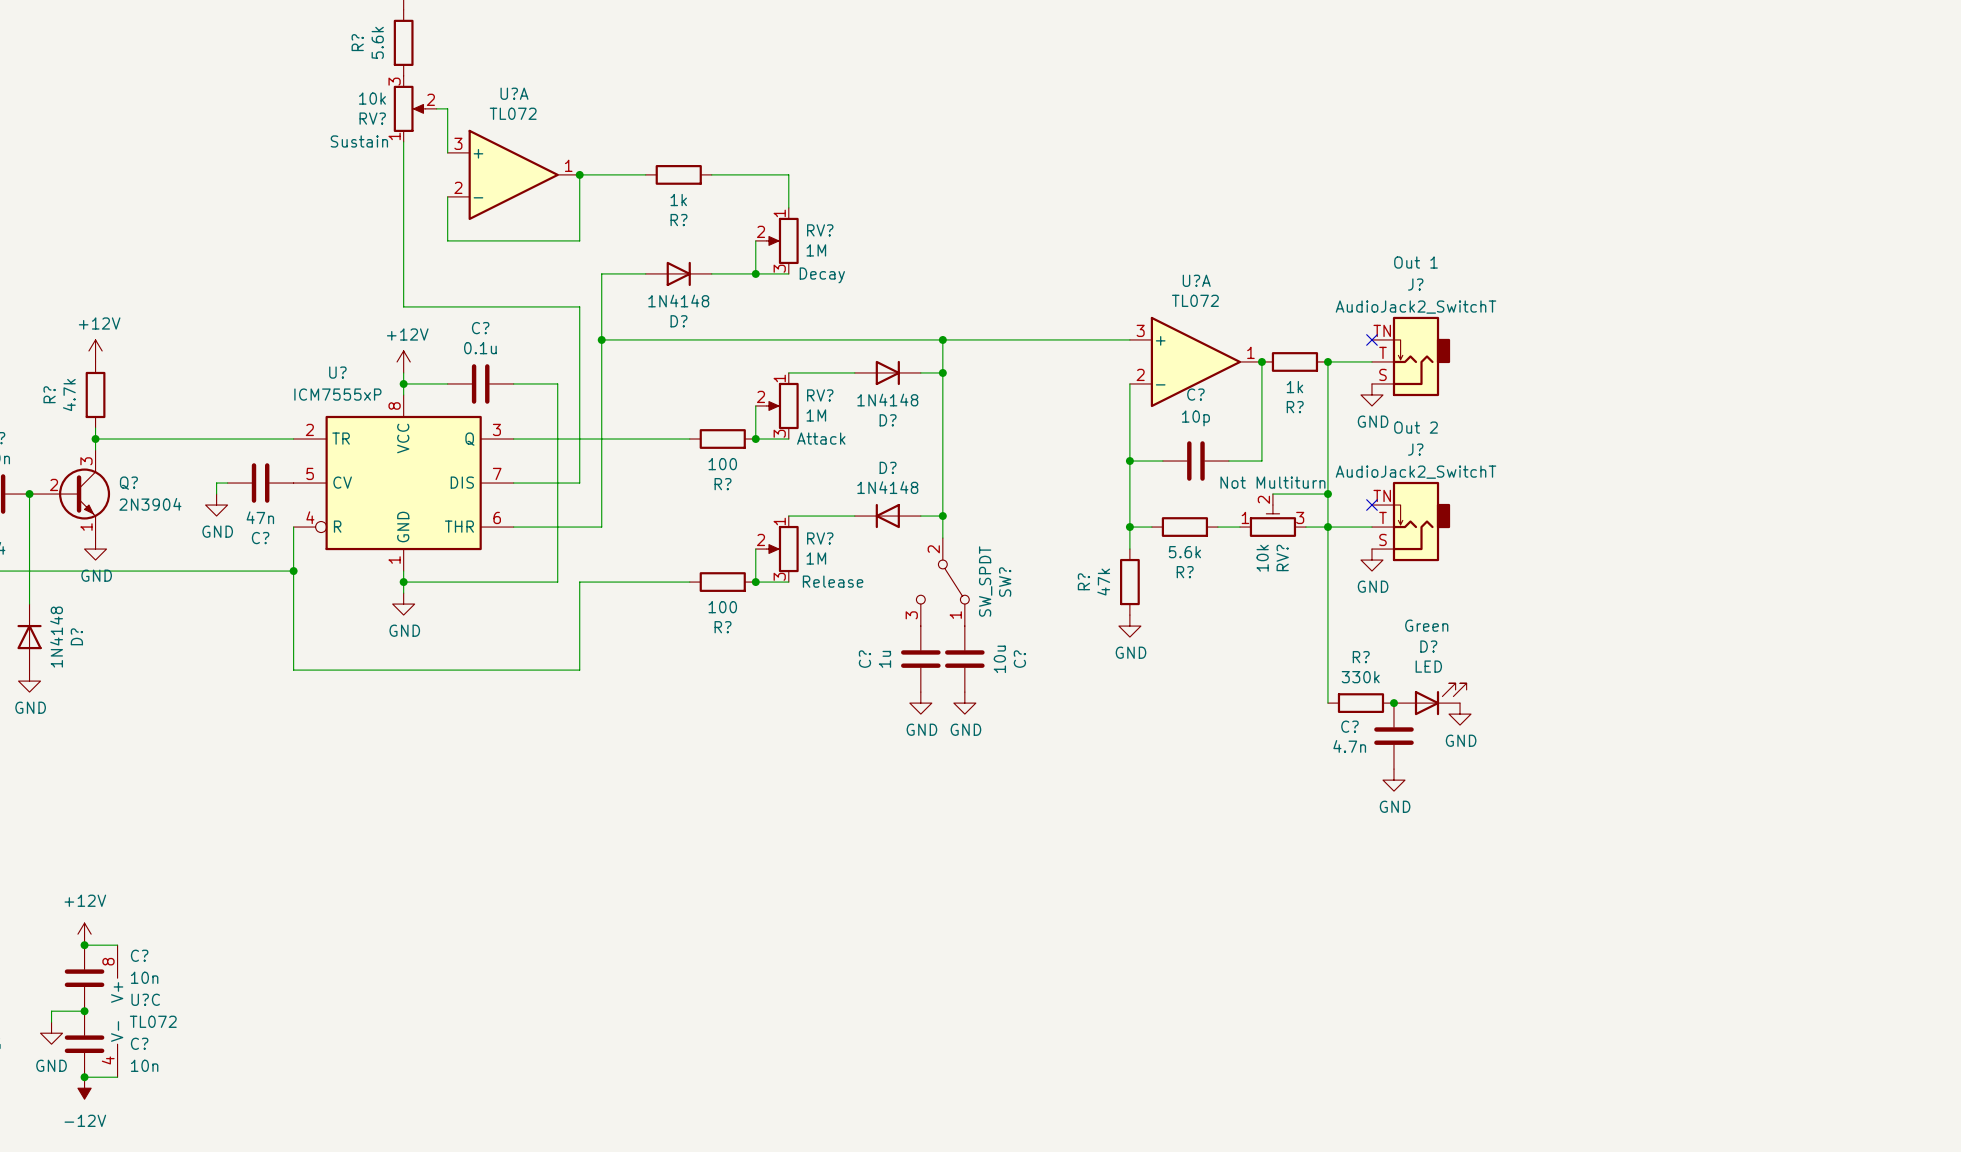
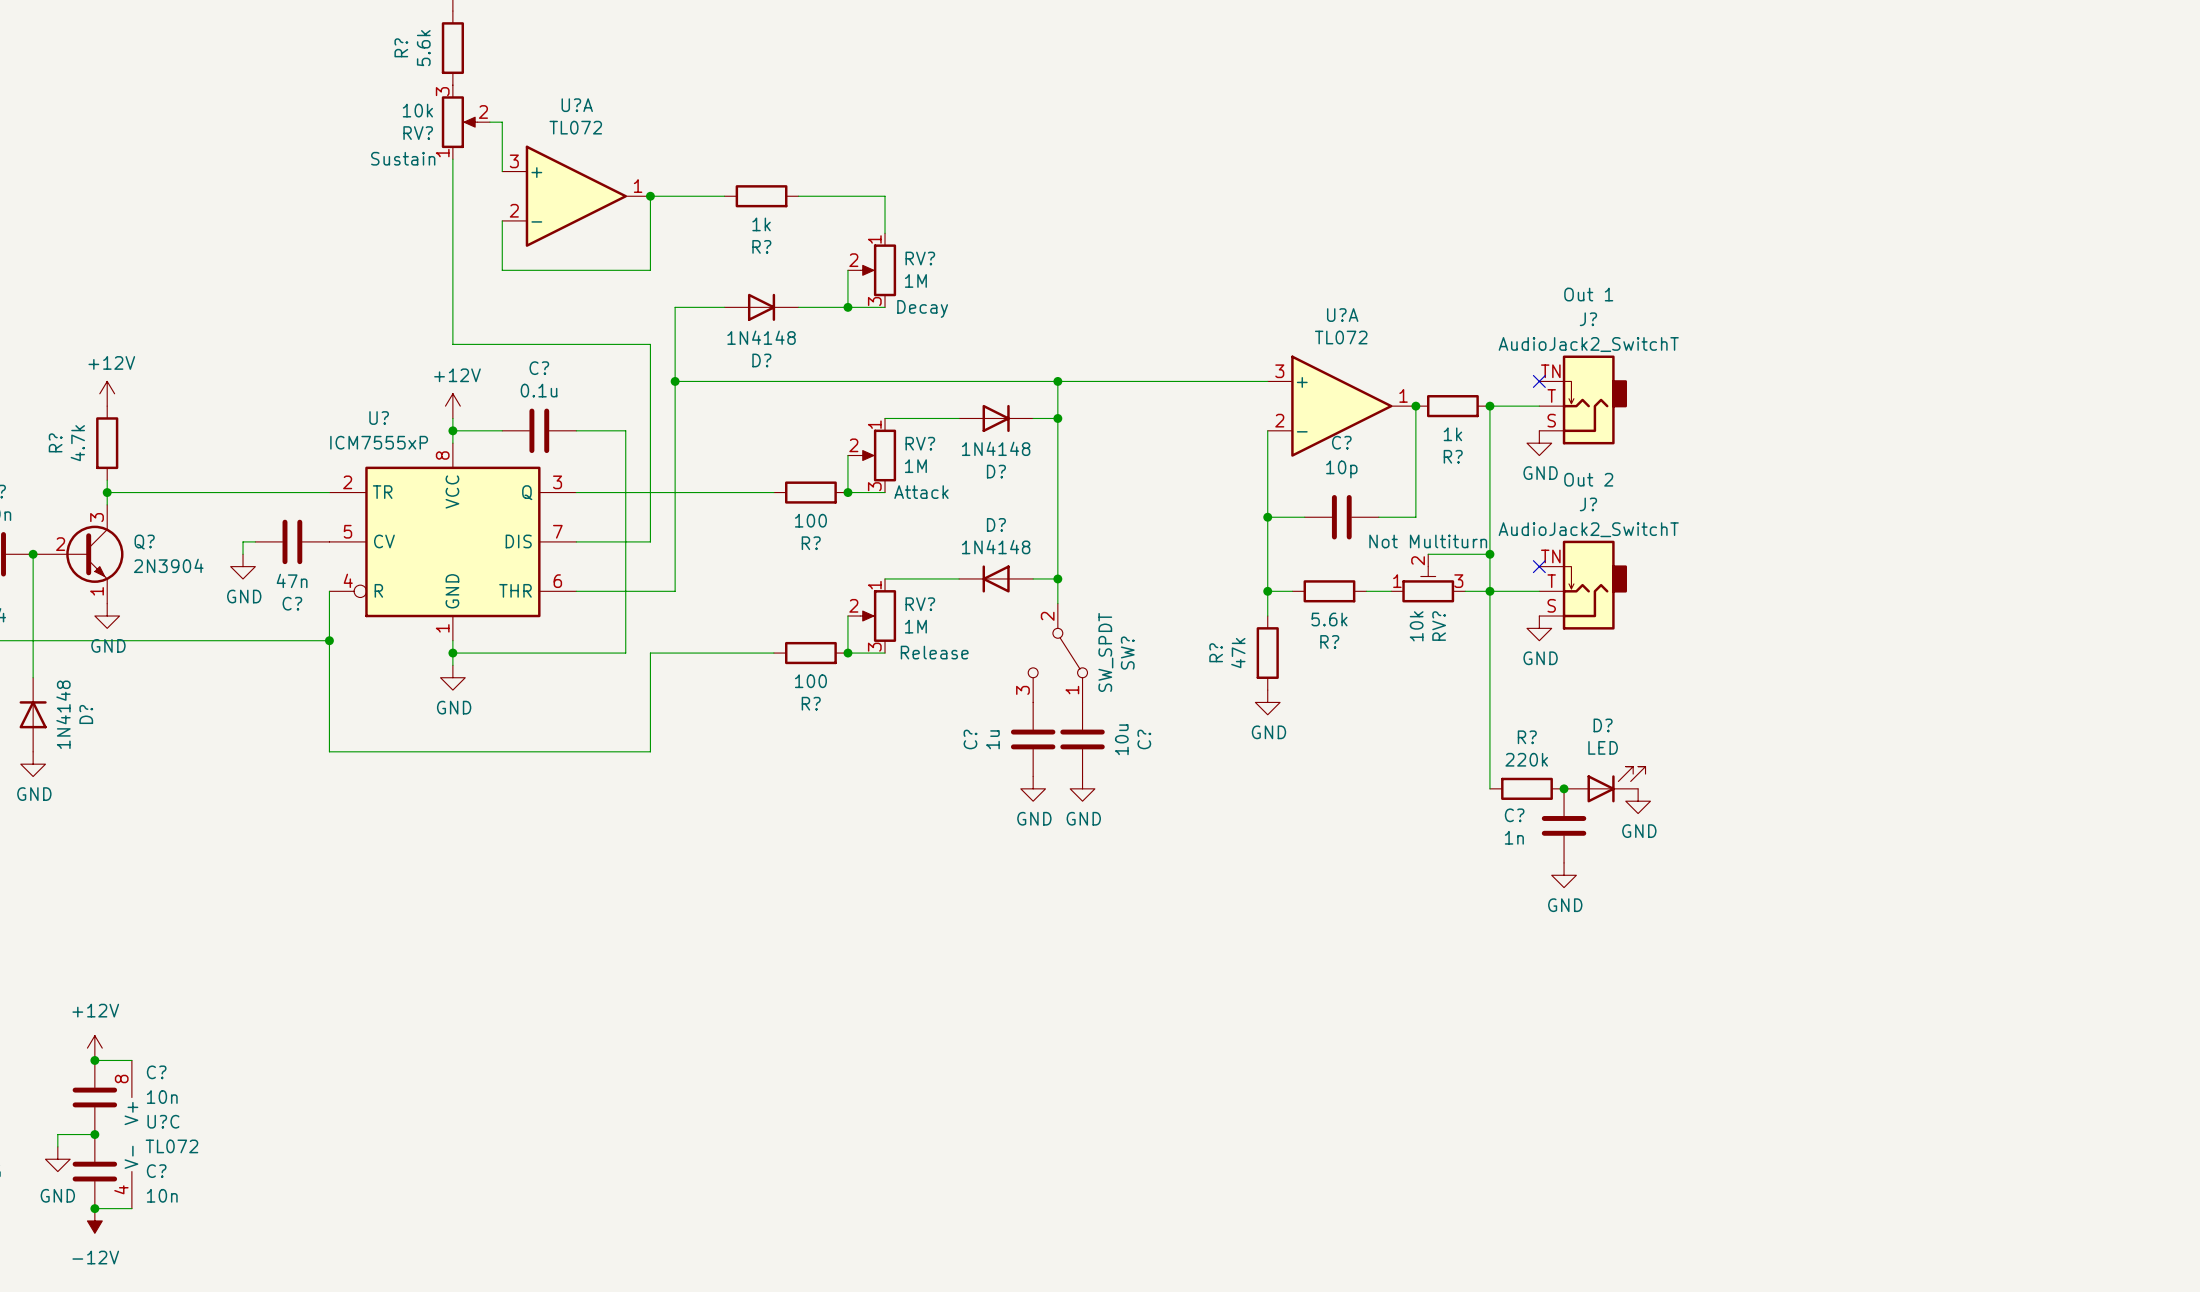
D? text: Green (1426, 625) -> none
R? value: 330k (1360, 677) -> 220k (1526, 759)
C? value: 4.7n (1349, 746) -> 1n (1514, 837)

